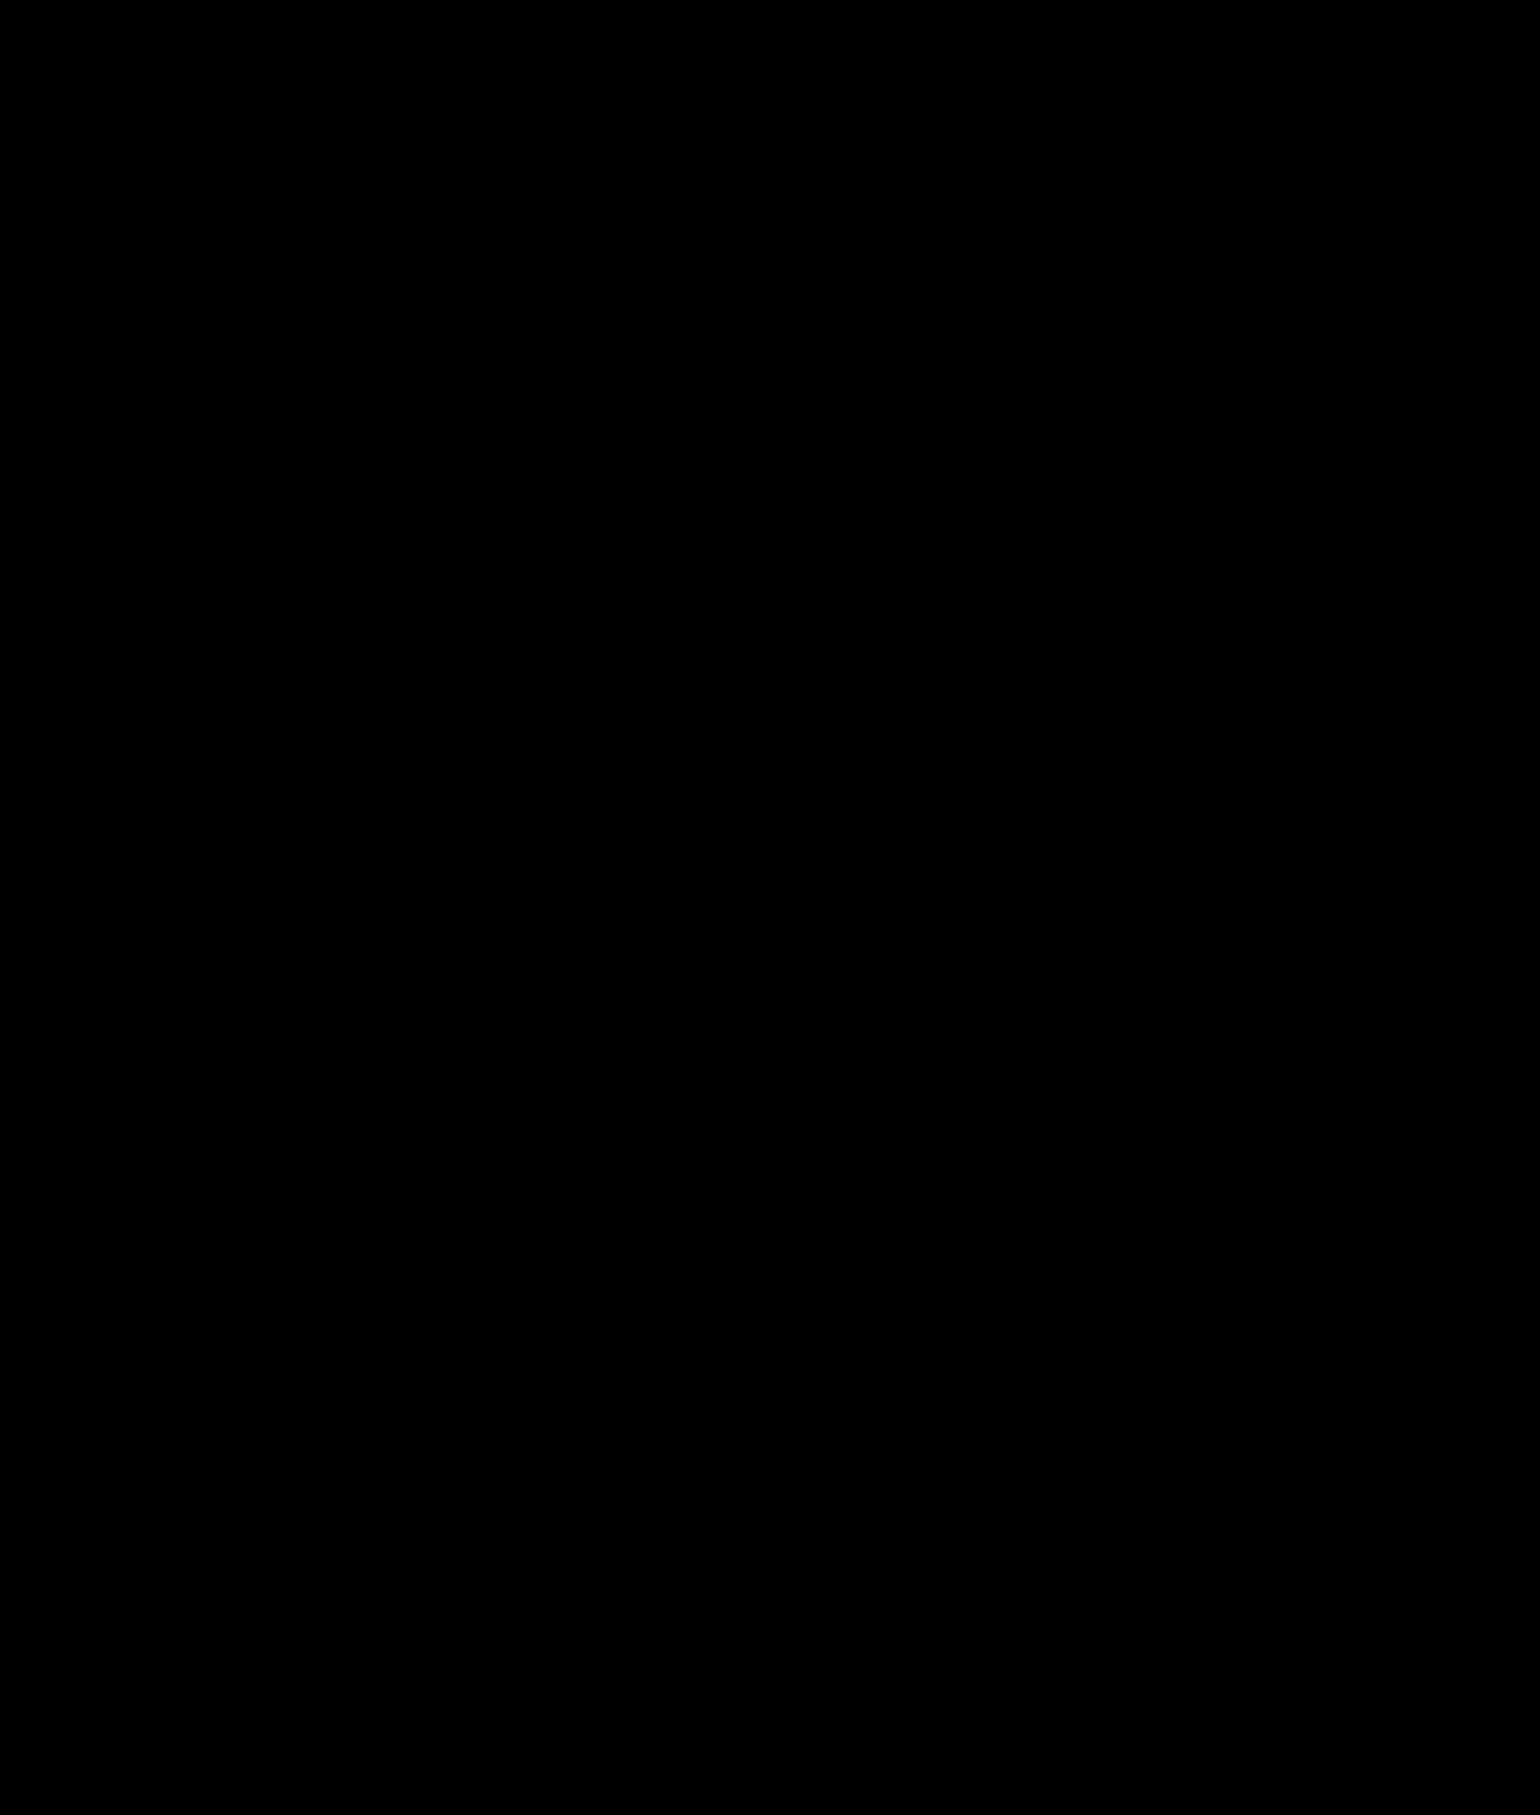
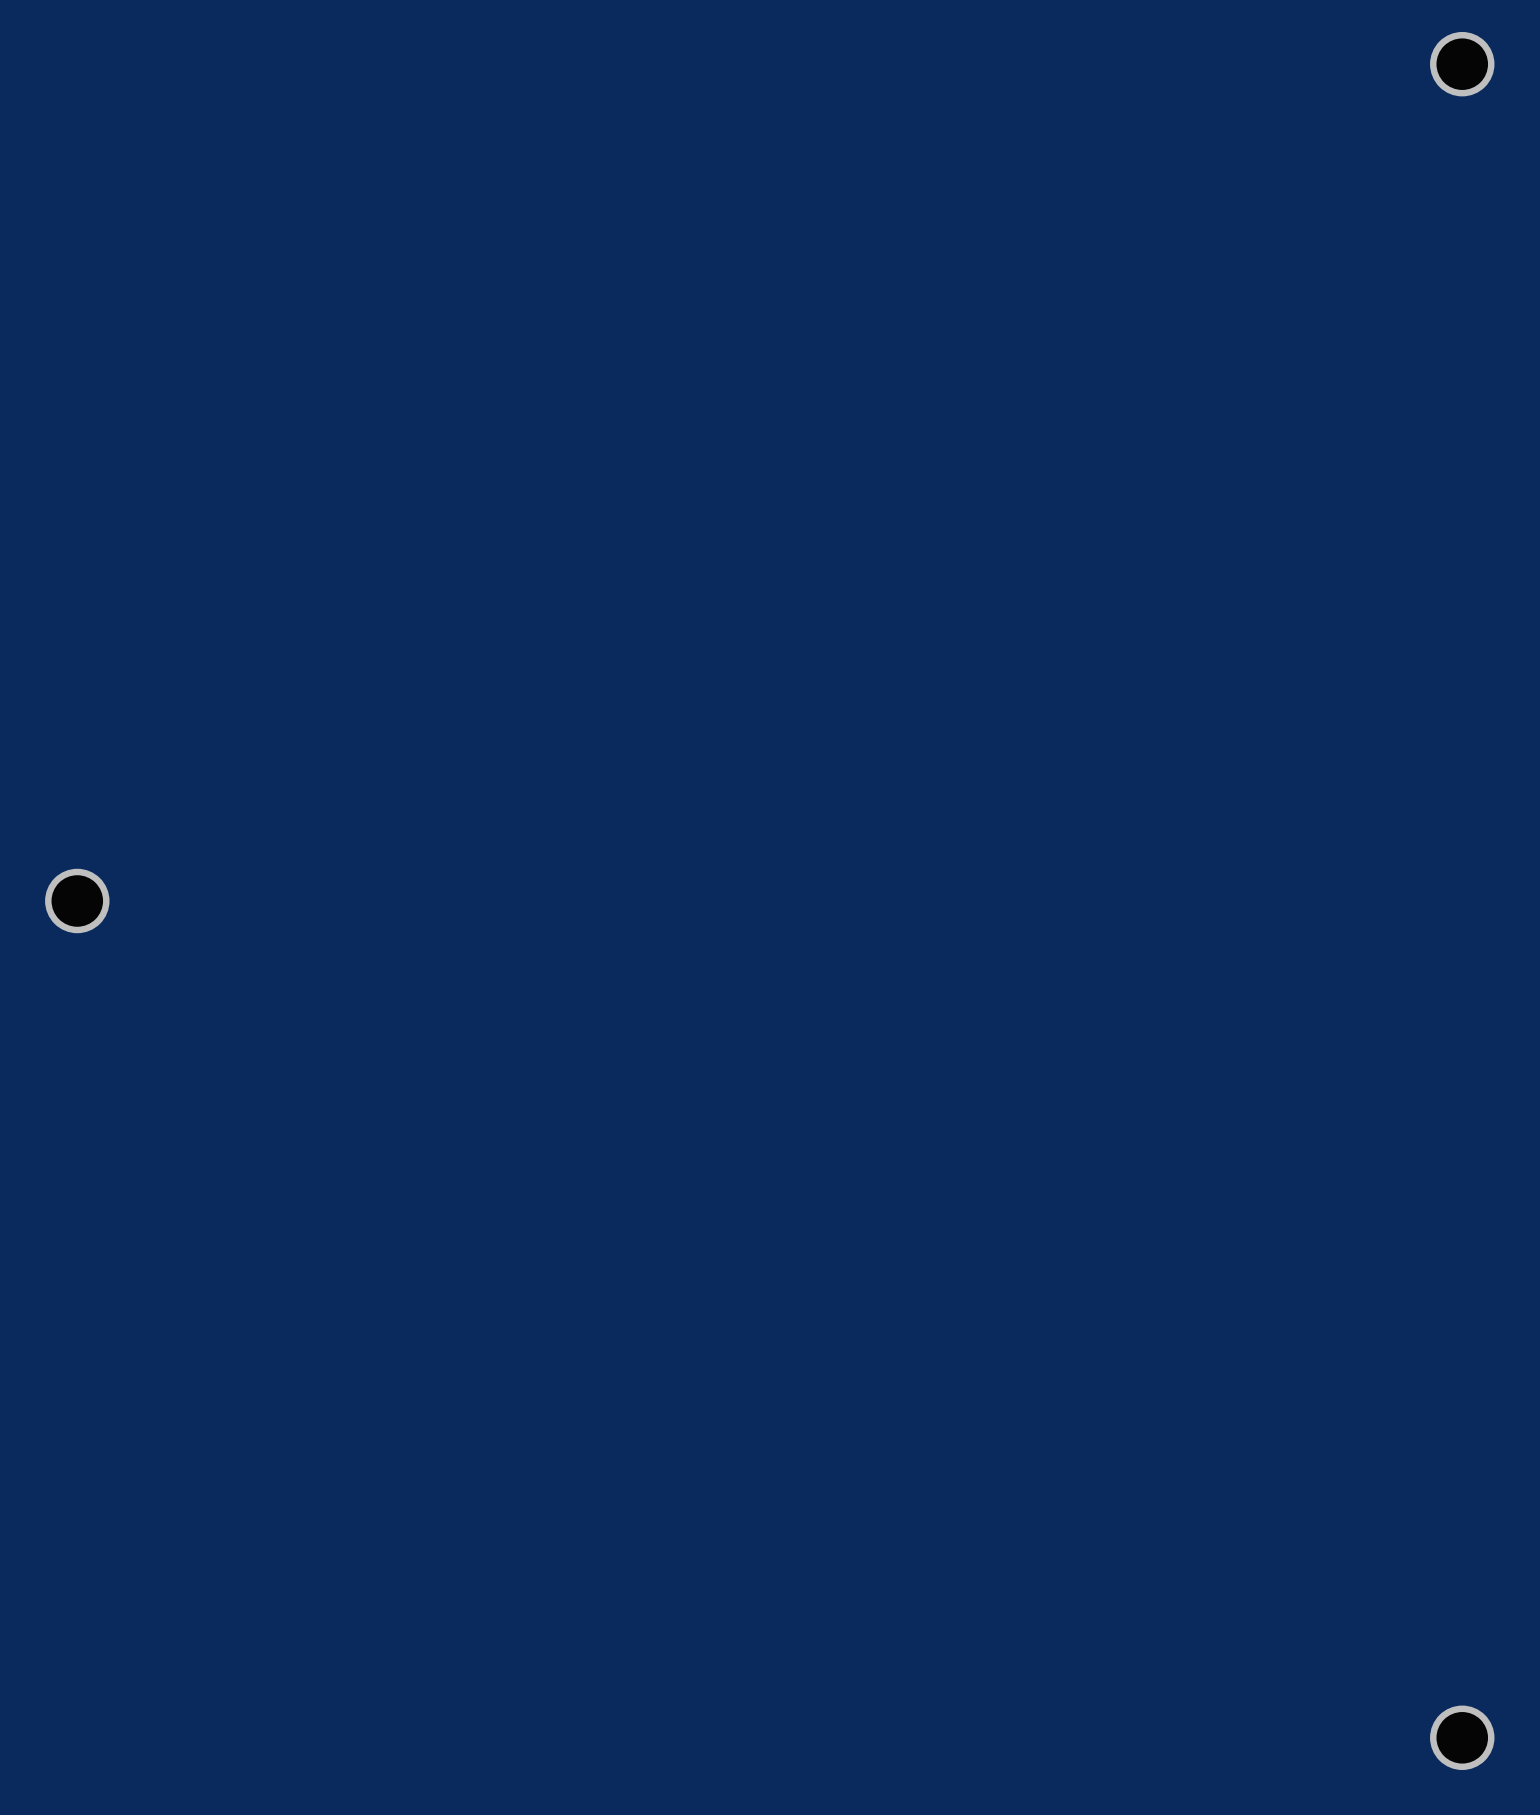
via: none -> (1462, 64)
via: none -> (77, 900)
via: none -> (1462, 1737)

